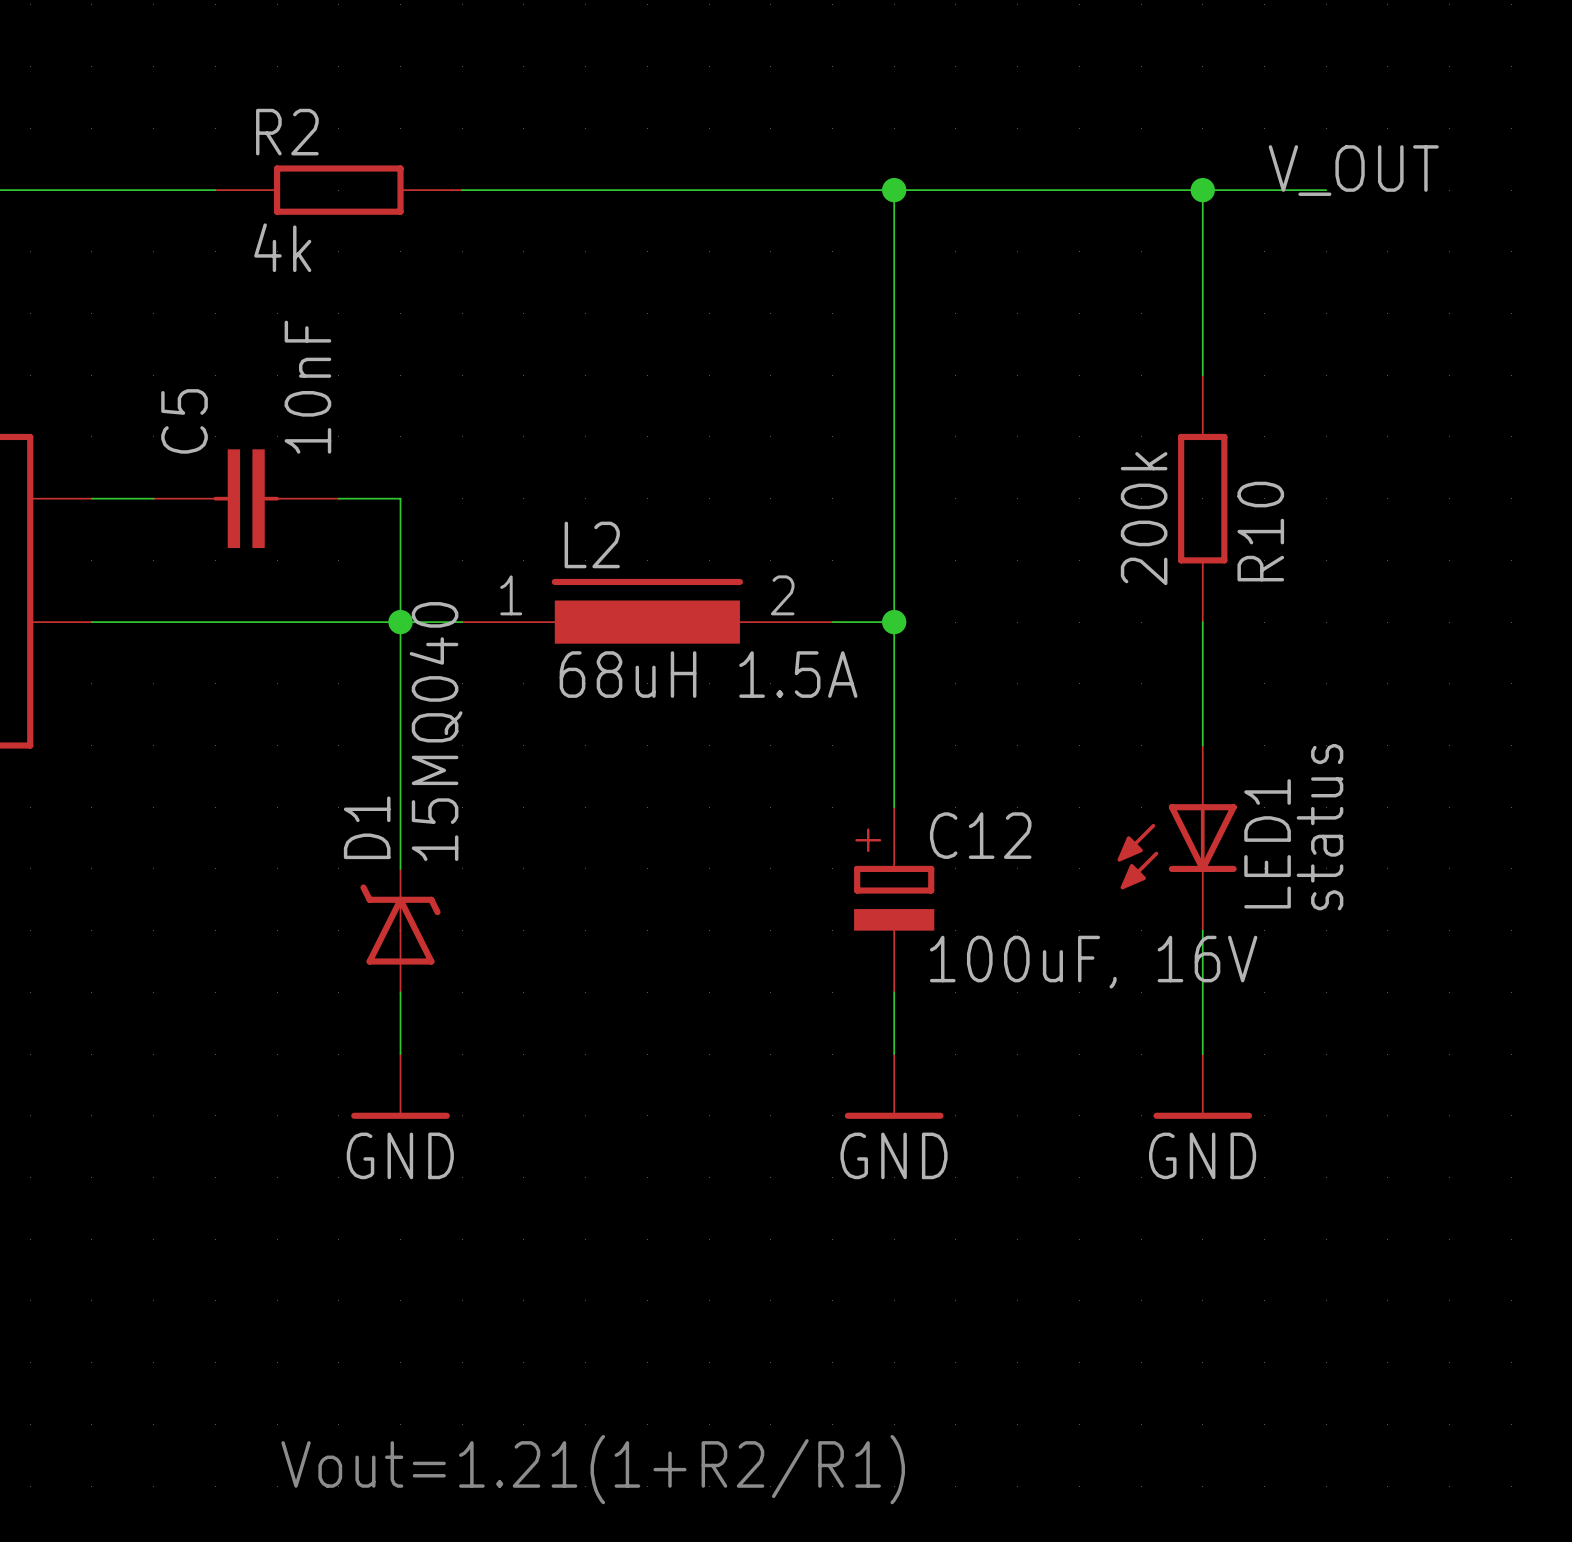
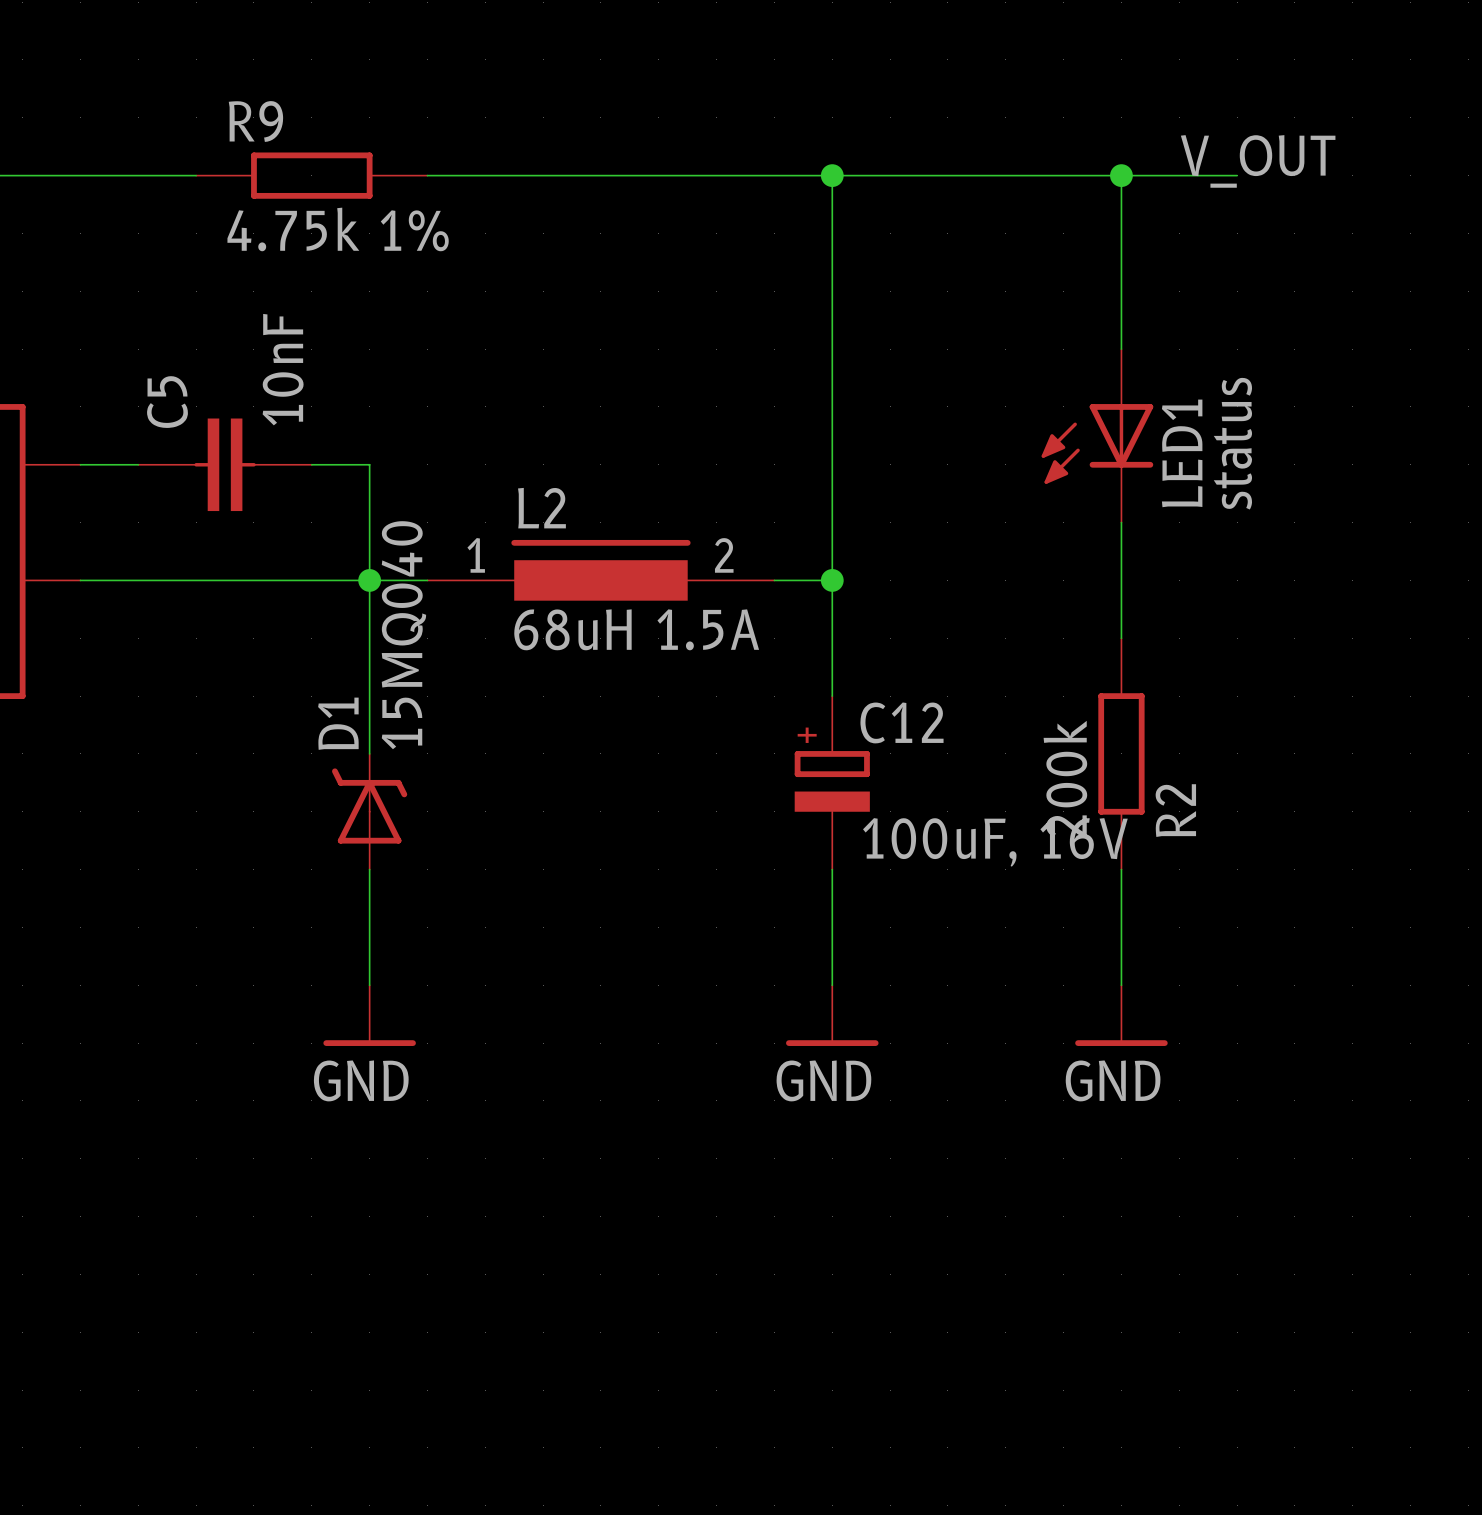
R2 name: R2 (287, 132) -> R9 (255, 121)
R2 value: 4k (282, 247) -> 4.75k 1% (338, 229)
R10: 200k (1202, 498) -> none
R2: none -> 200k (1121, 753)
LED1 position: (1177, 838) -> (1097, 435)
C12 position: (894, 899) -> (832, 782)
D1 position: (400, 930) -> (369, 811)
text: Vout=1.21(1+R2/R1) (593, 1469) -> none

